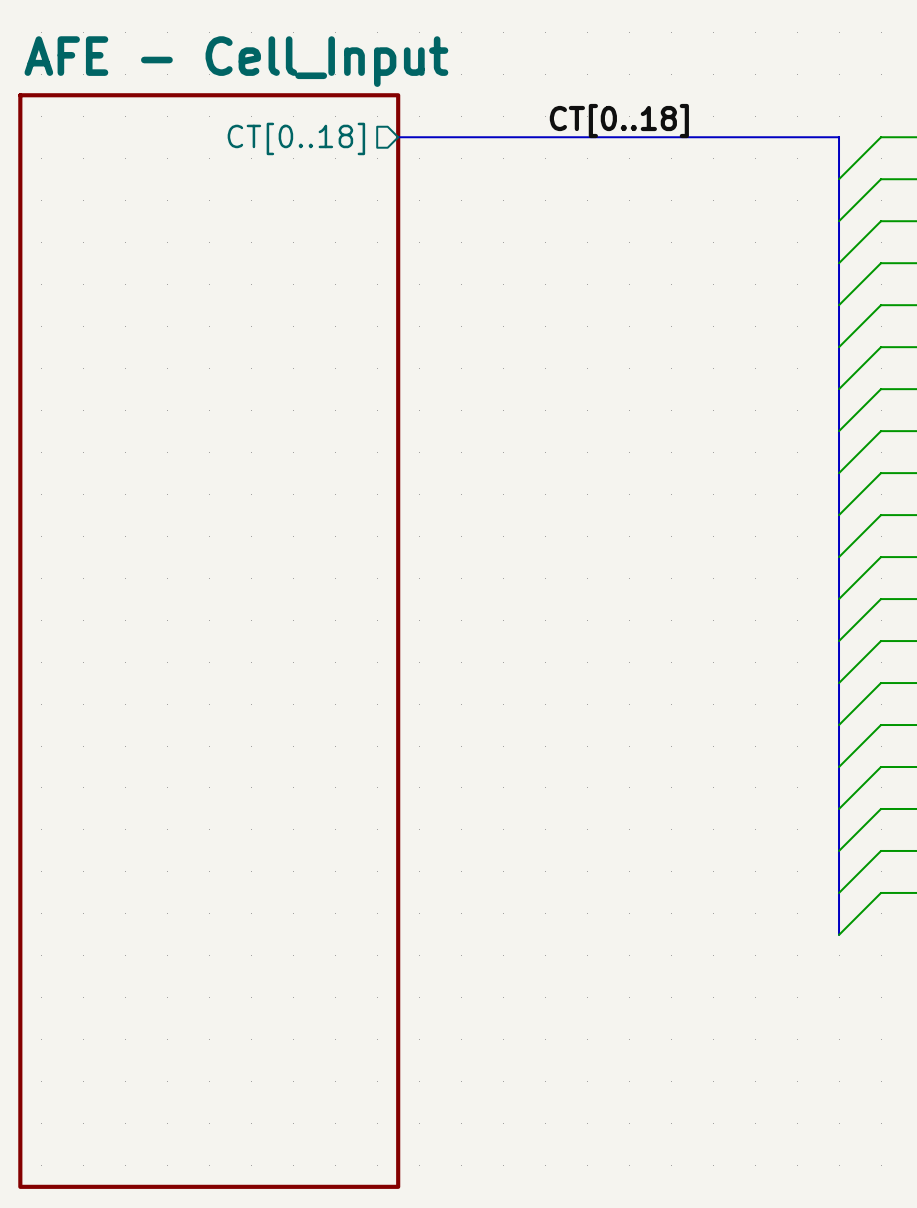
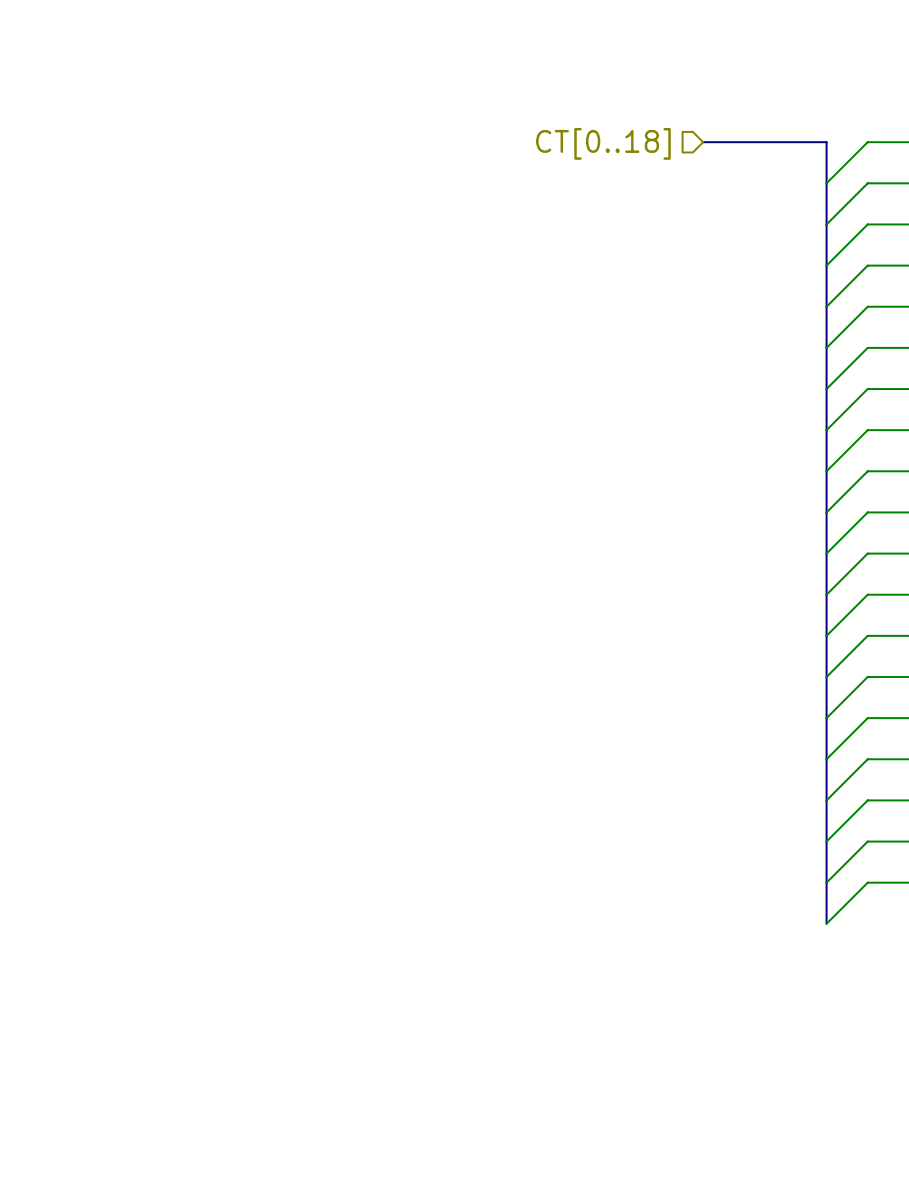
label: CT[0..18] (619, 121) -> none
bus: (398, 137) (713, 137) -> none
sheet pin: CT[0..18] (296, 138) -> none
hierarchical label: none -> CT[0..18] (603, 143)
sheet AFE - Cell_Input: (209, 641) -> none

